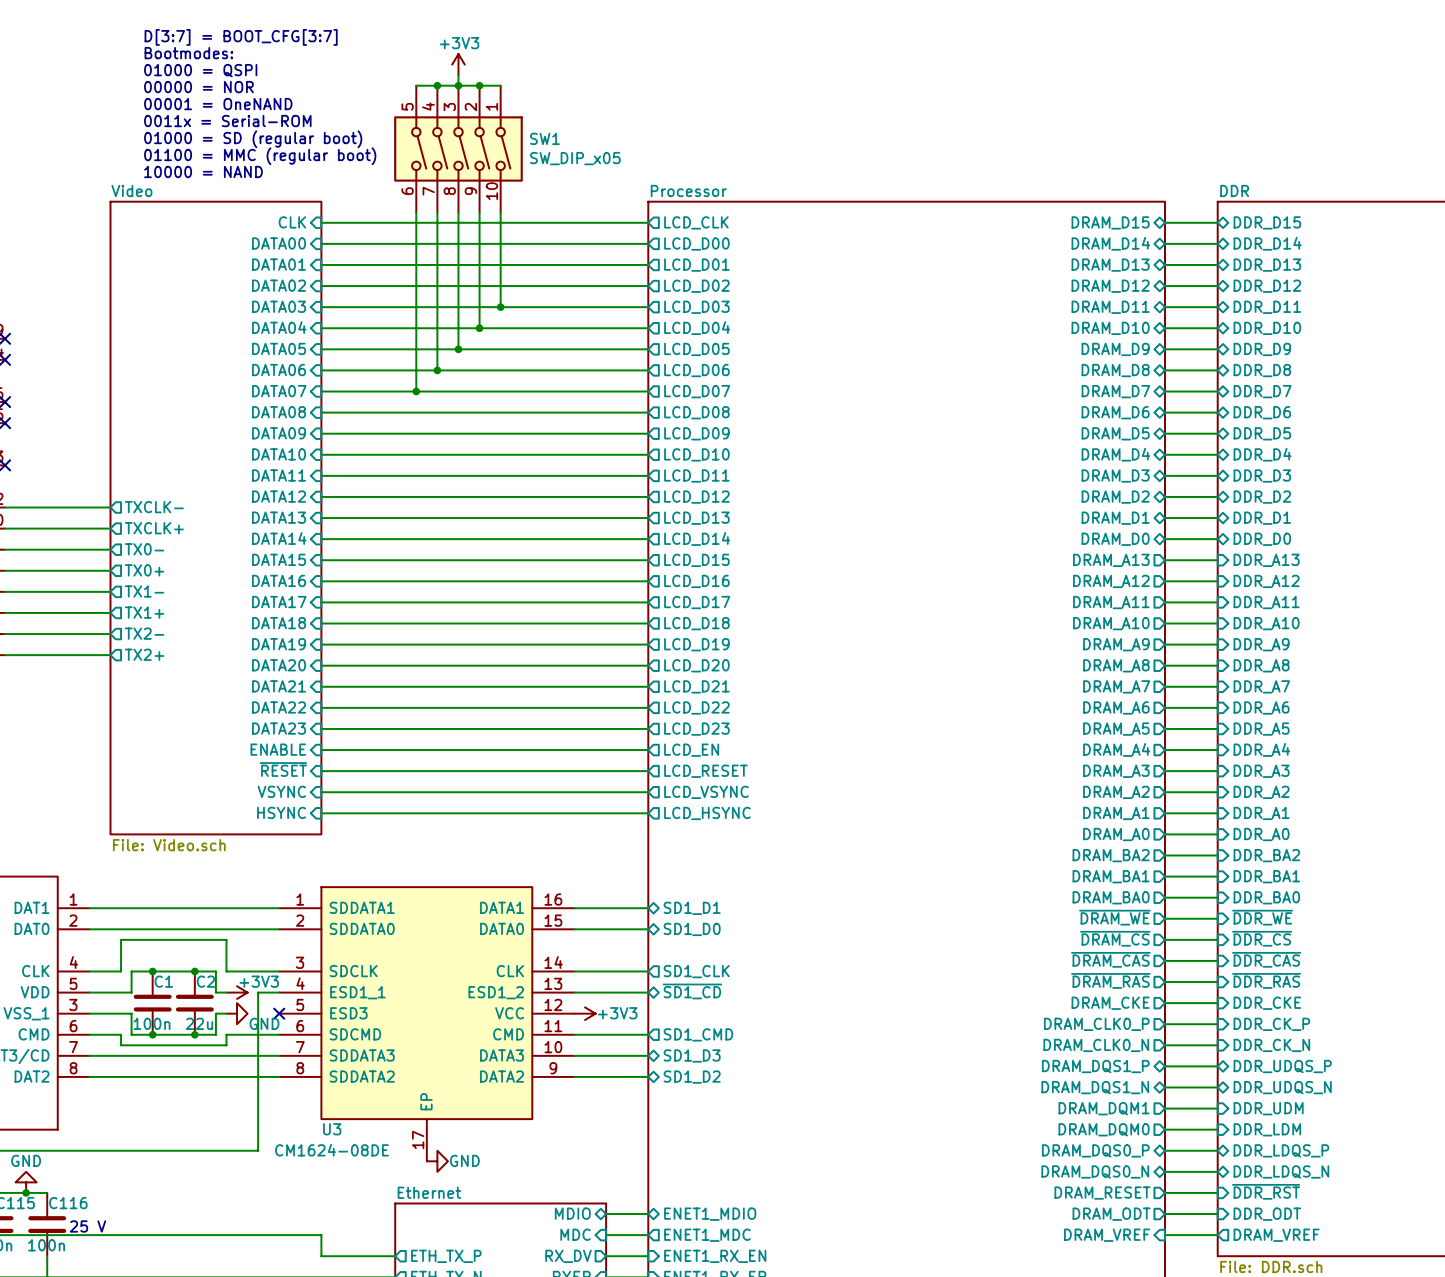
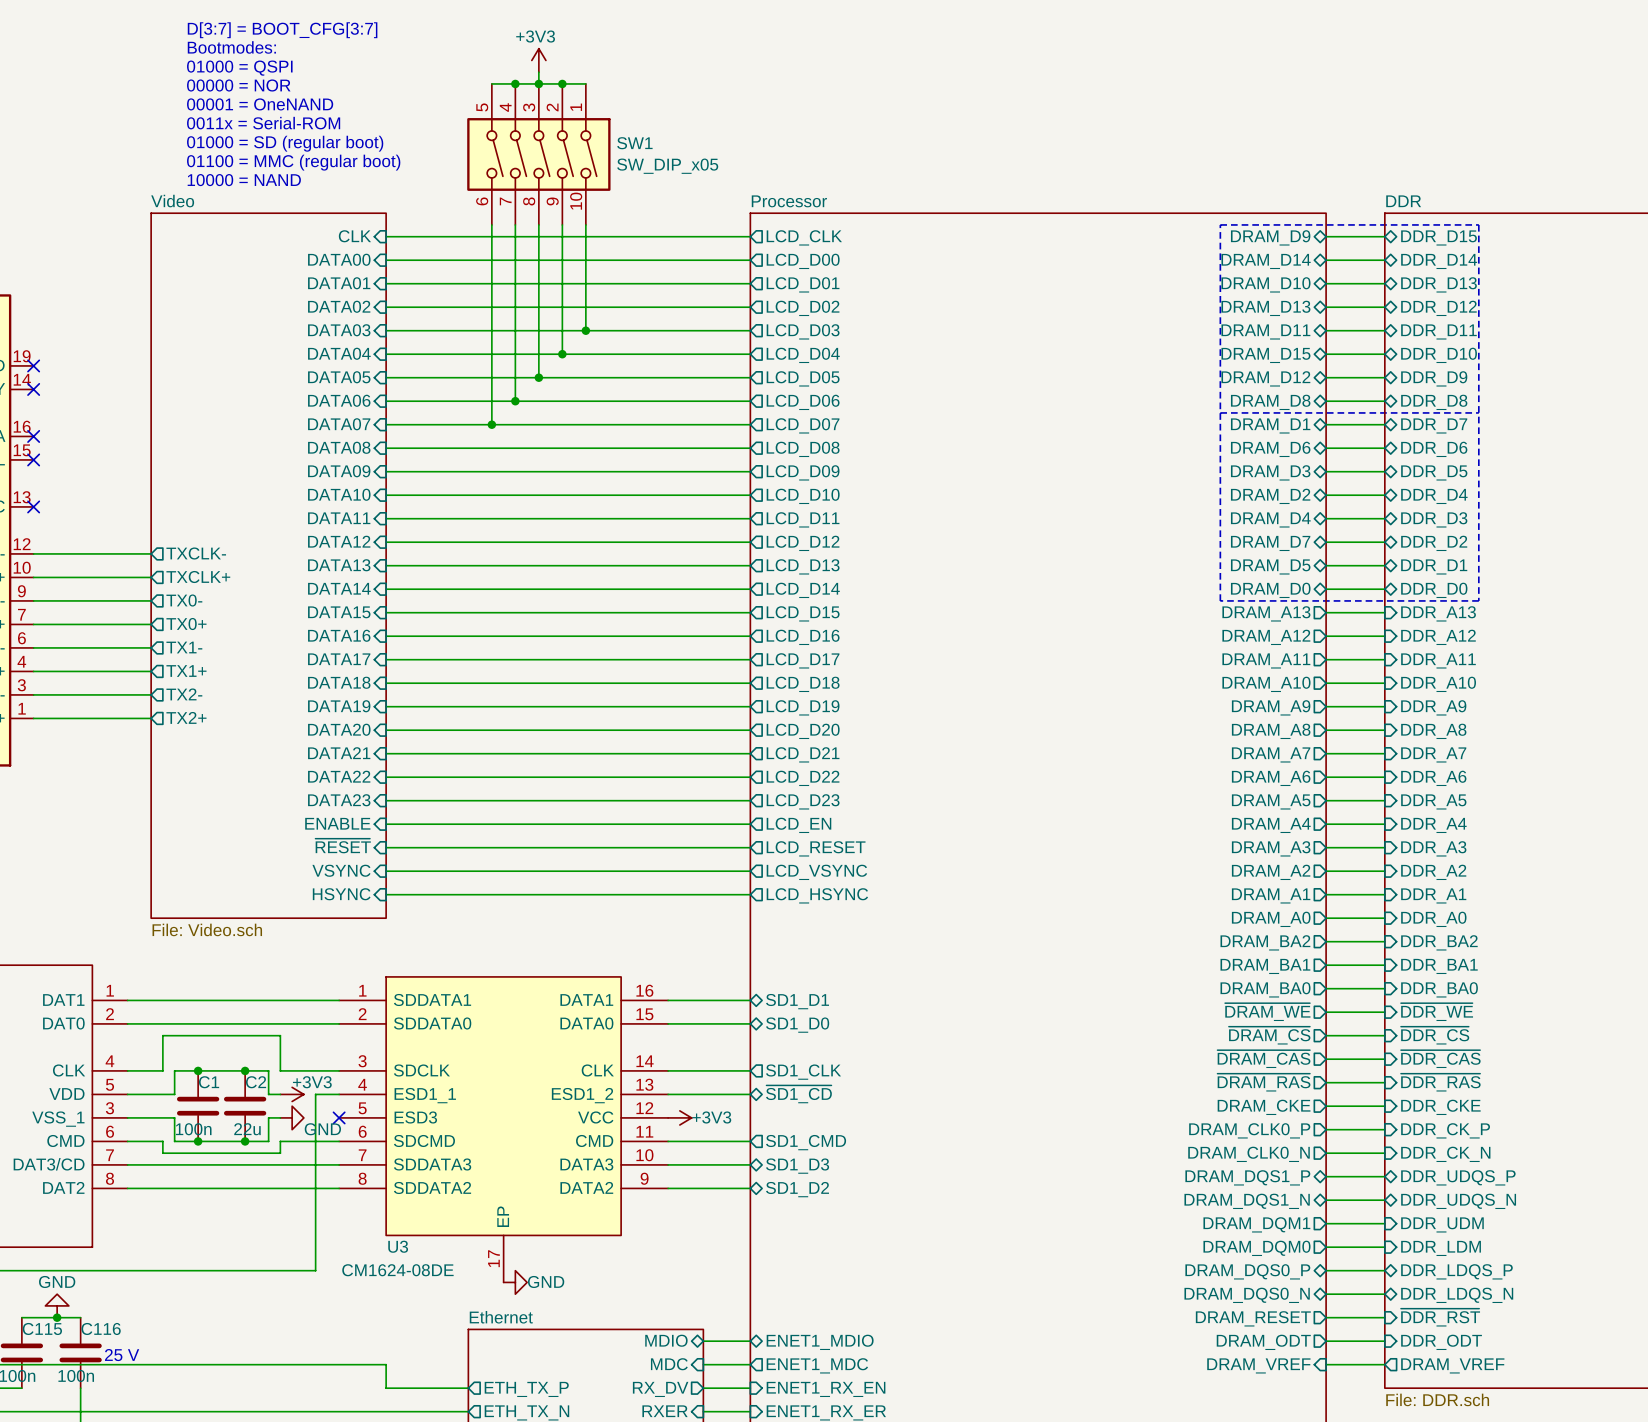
line: none -> (1220, 224) (1220, 600) (1478, 600) (1478, 224) (1220, 224)
sheet pin: DRAM_D15 (1110, 222) -> DRAM_D9 (1270, 237)
sheet pin: DRAM_D13 (1110, 265) -> DRAM_D10 (1265, 284)
sheet pin: DRAM_D12 (1110, 286) -> DRAM_D13 (1265, 308)
sheet pin: DRAM_D10 (1110, 328) -> DRAM_D15 (1265, 355)
sheet pin: DRAM_D9 (1115, 349) -> DRAM_D12 (1265, 378)
line: none -> (1220, 412) (1478, 412)
sheet pin: DRAM_D7 (1115, 391) -> DRAM_D1 (1270, 425)
sheet pin: DRAM_D5 (1115, 433) -> DRAM_D3 (1270, 472)
sheet pin: DRAM_D4 (1115, 454) -> DRAM_D2 (1270, 496)
sheet pin: DRAM_D3 (1115, 475) -> DRAM_D4 (1270, 519)
sheet pin: DRAM_D2 (1115, 497) -> DRAM_D7 (1270, 543)
sheet pin: DRAM_D1 (1115, 518) -> DRAM_D5 (1270, 566)

